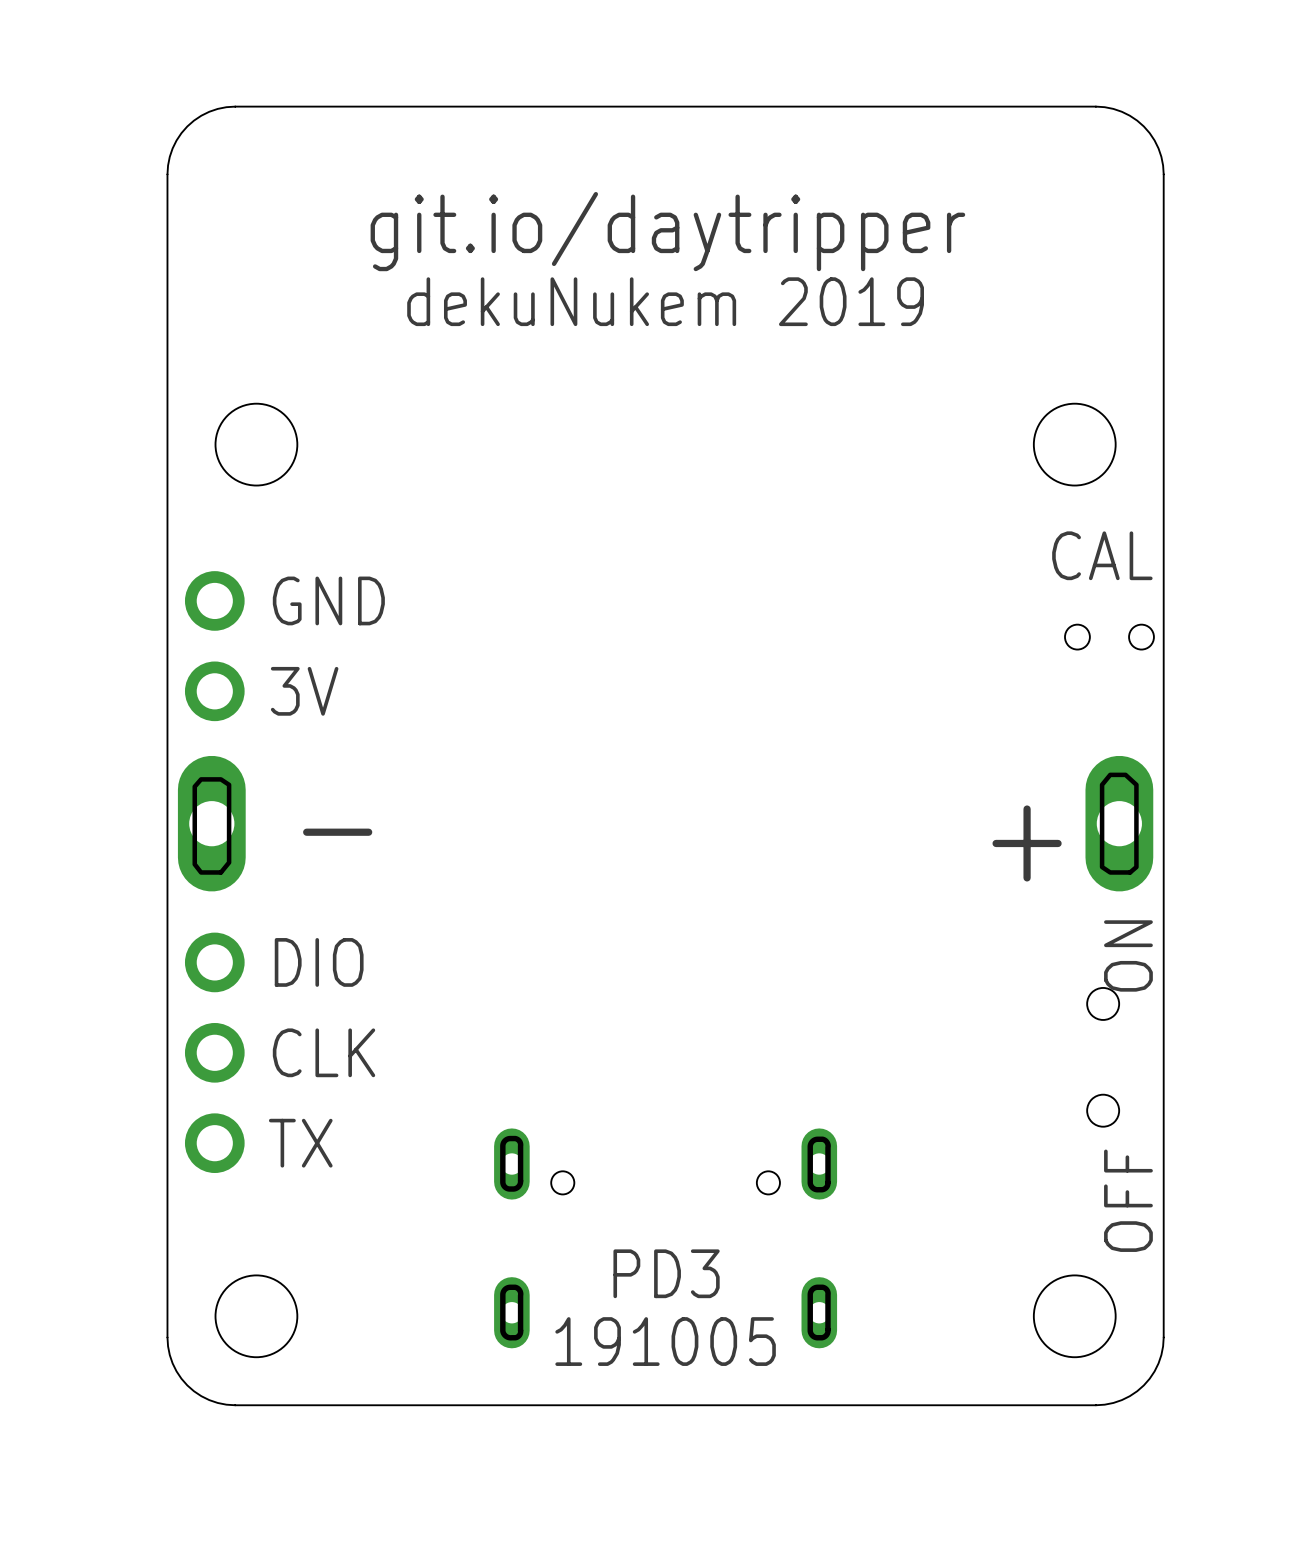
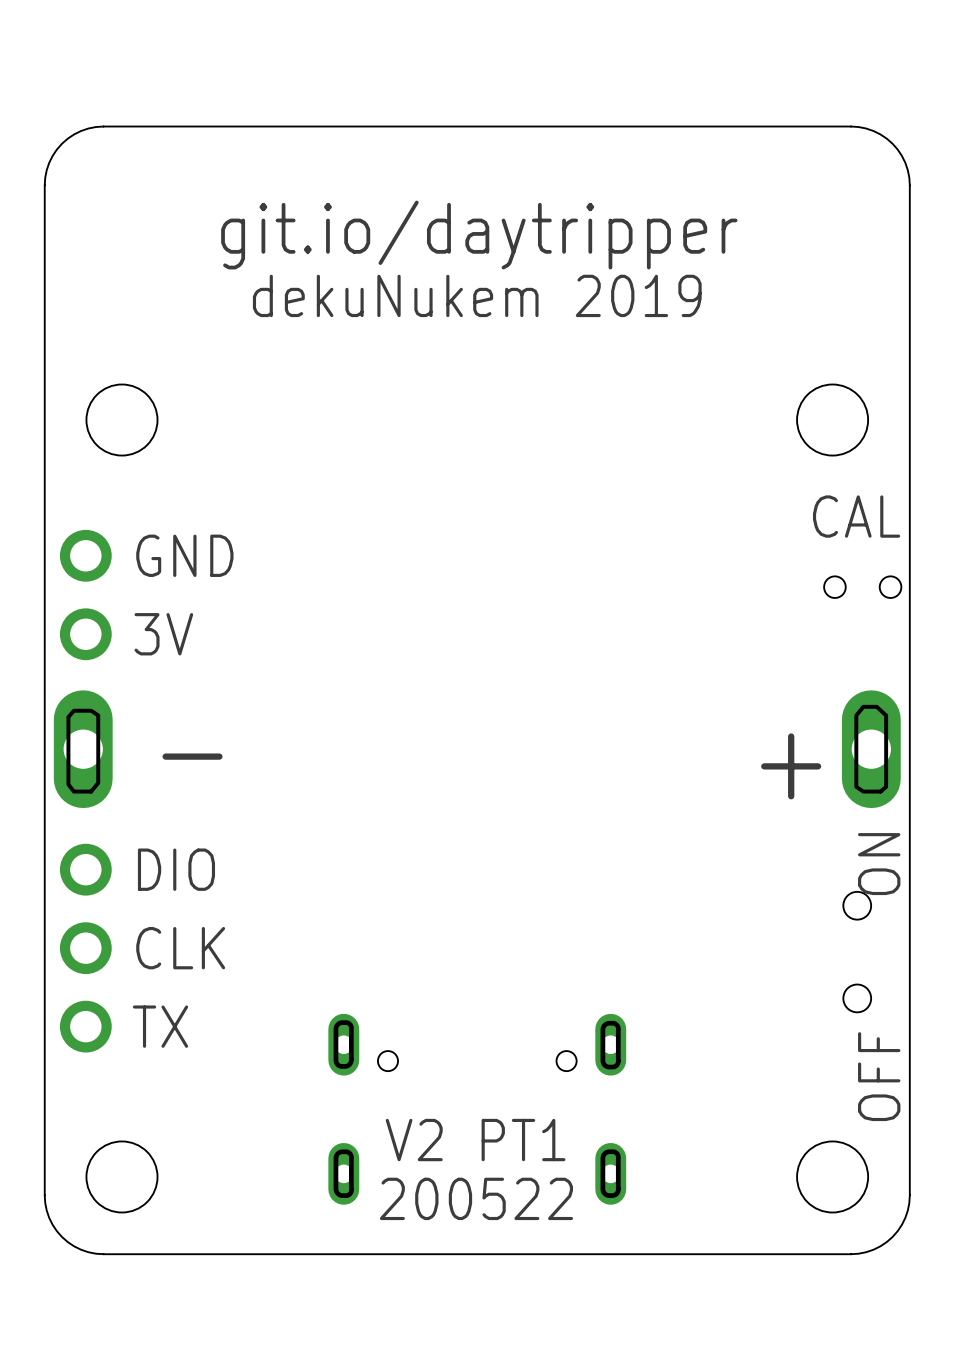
text: PD3 (666, 1273) -> V2 PT1 (475, 1140)
text: 191005 (665, 1341) -> 200522 (476, 1198)

